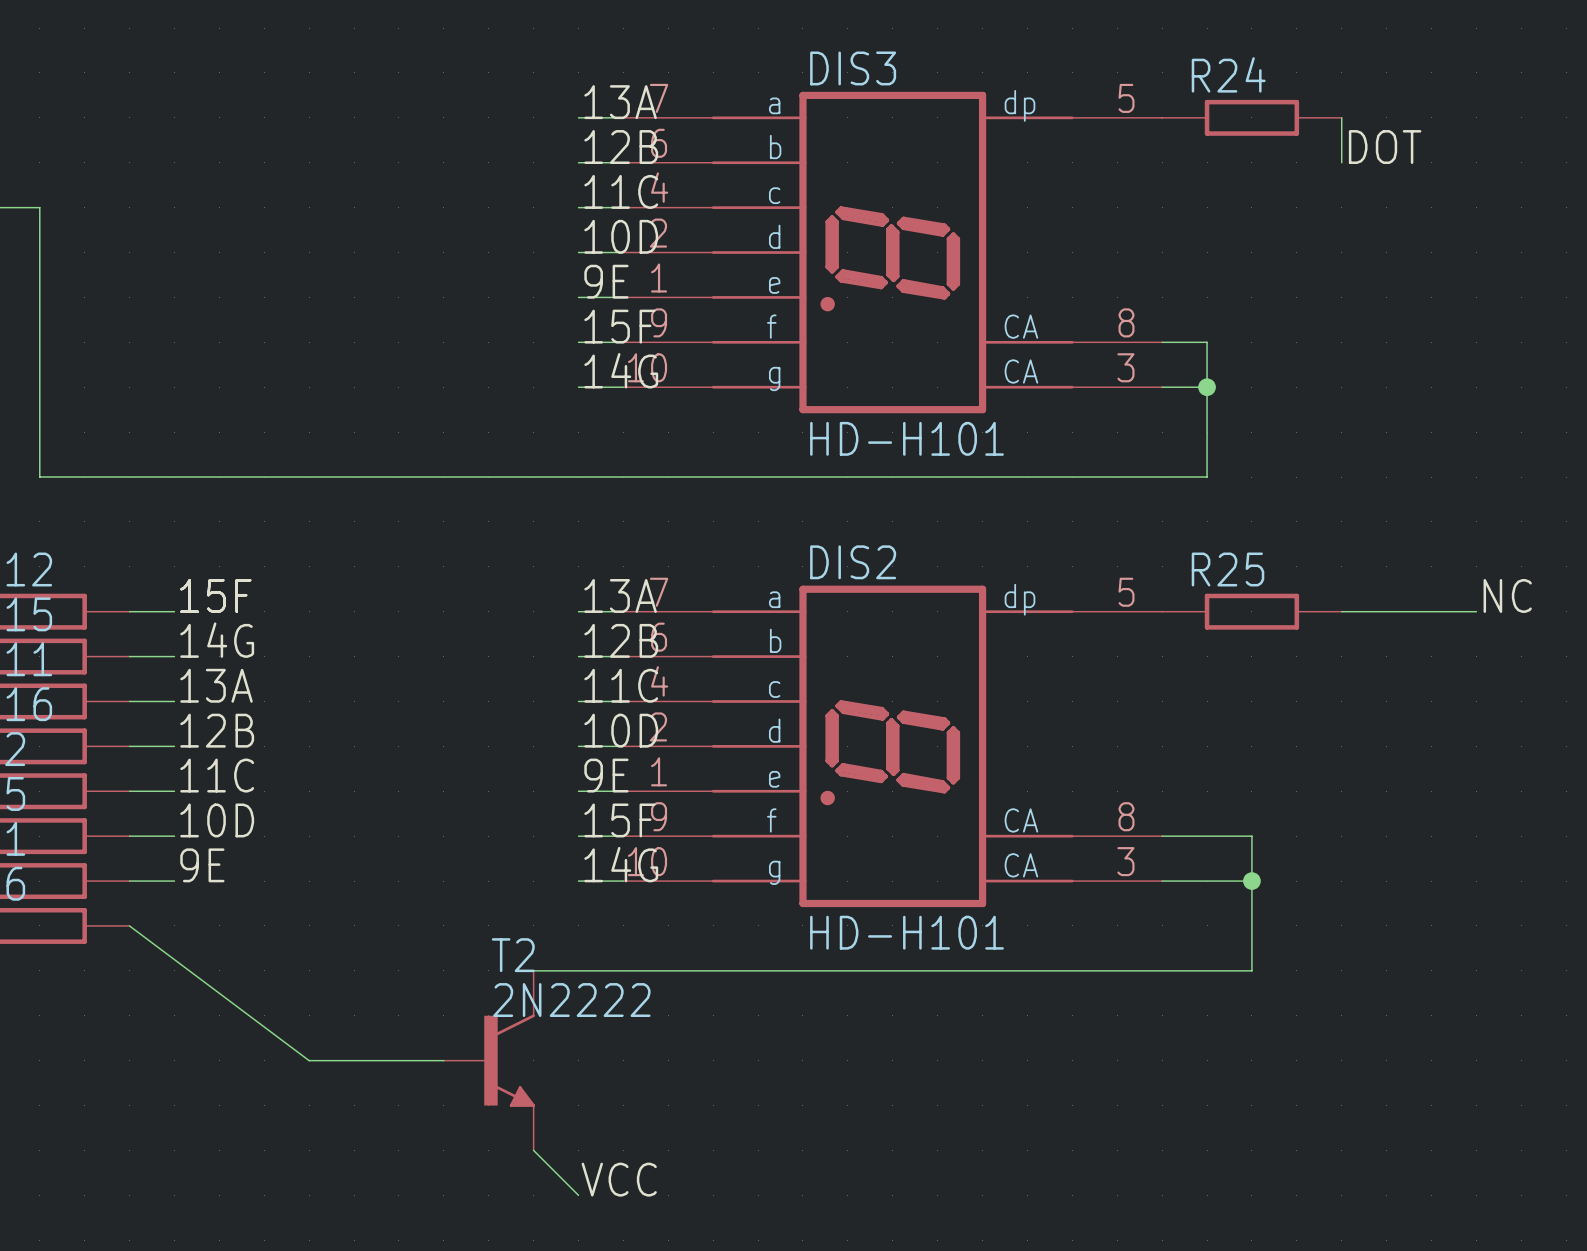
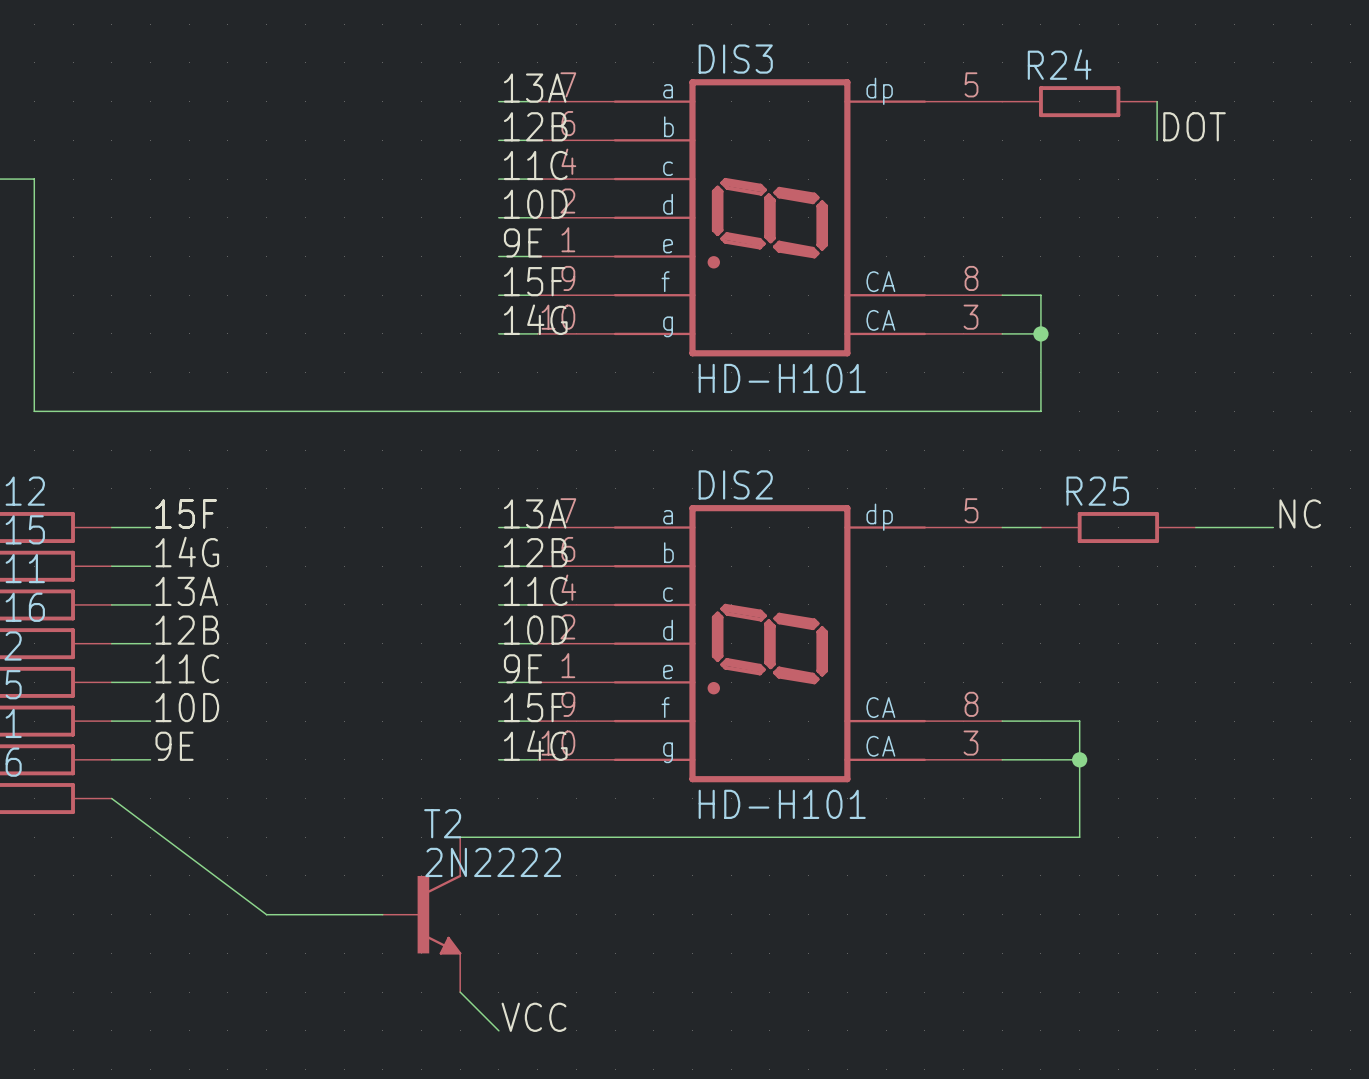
R25 position: (1251, 611) -> (1118, 527)

